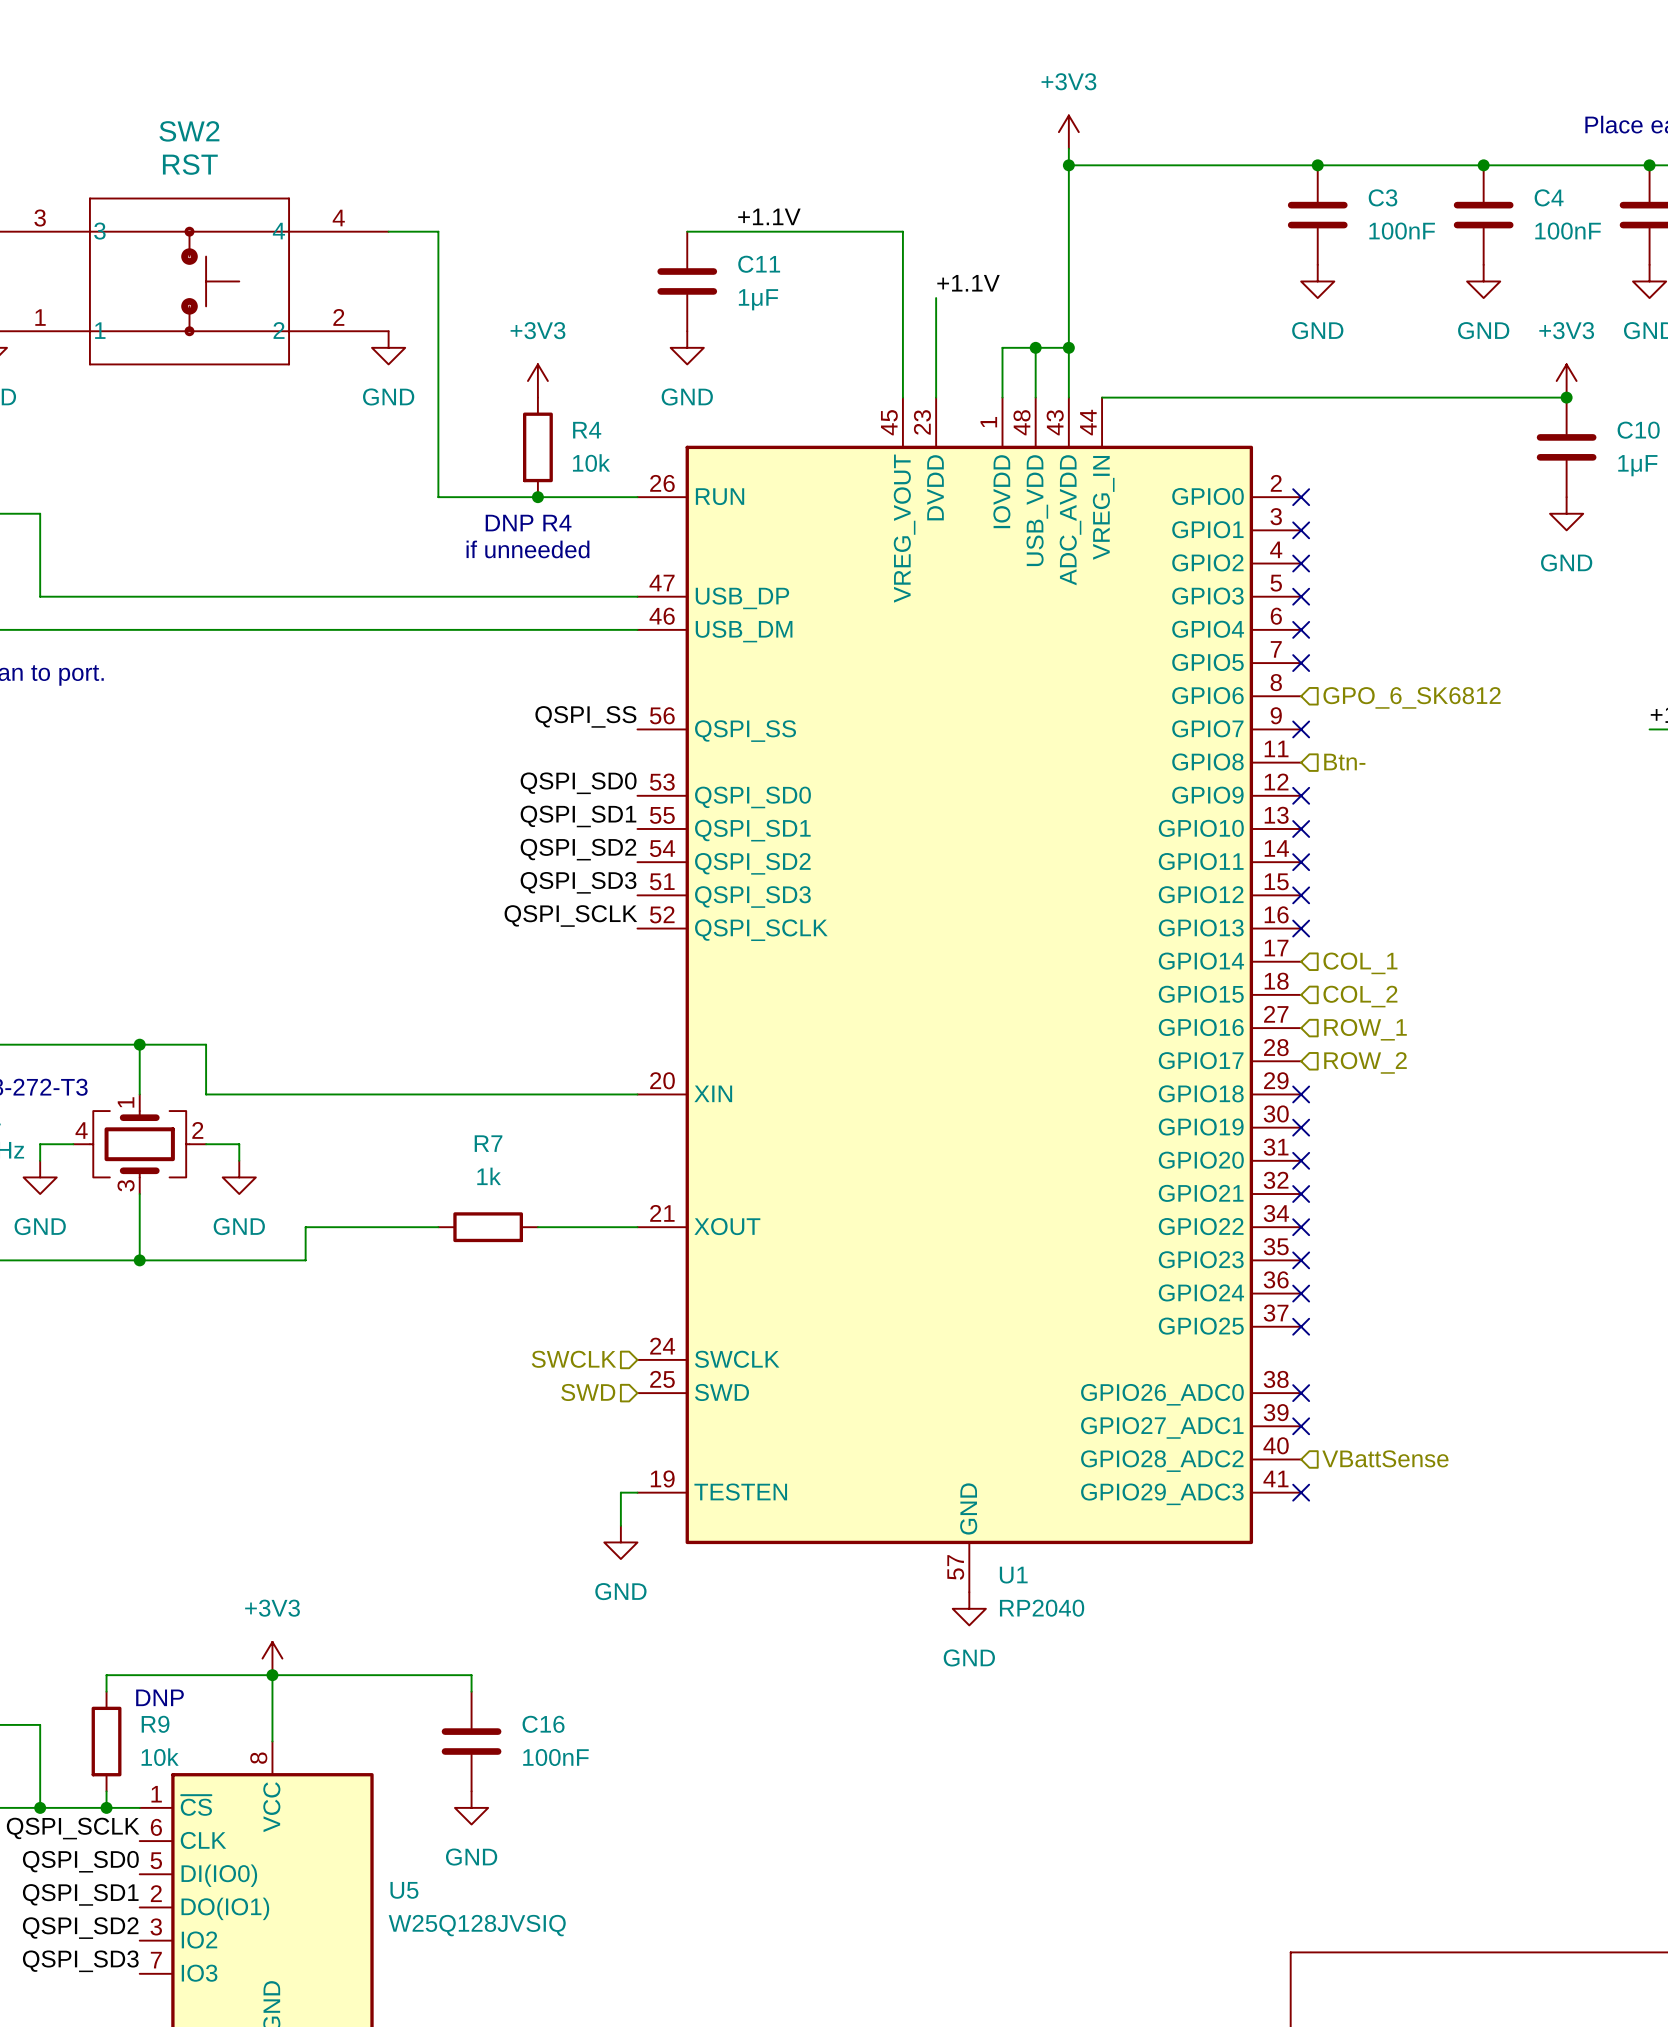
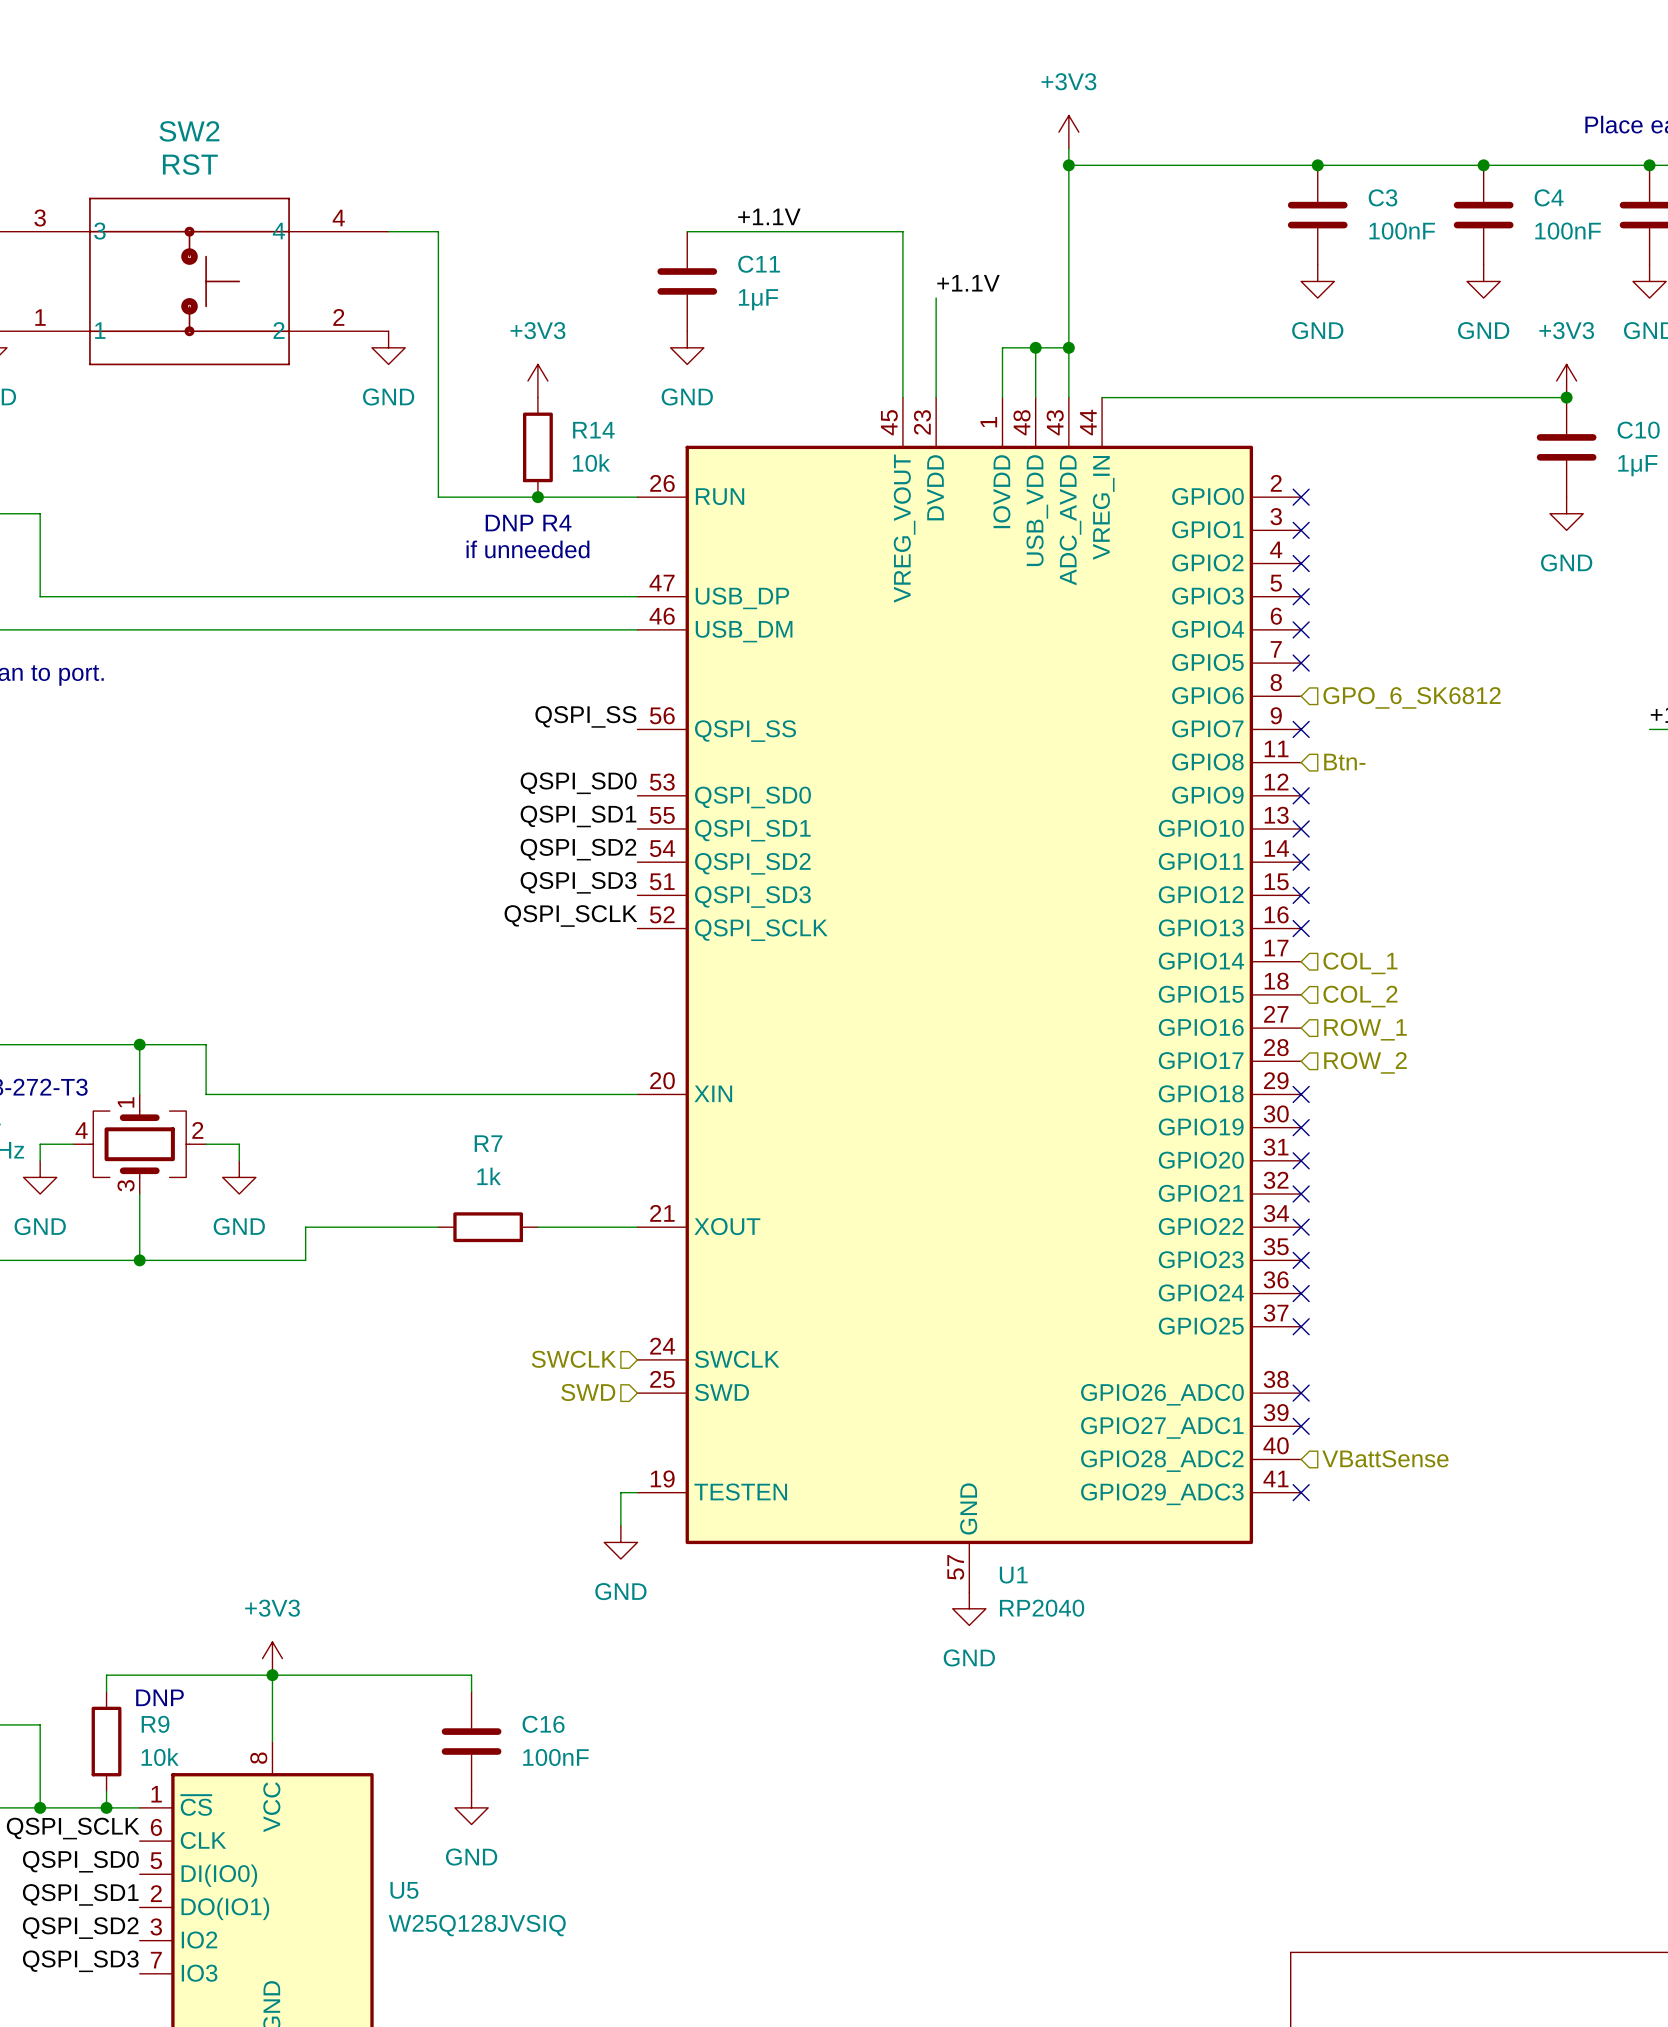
R4 name: R4 (587, 430) -> R14 (593, 430)

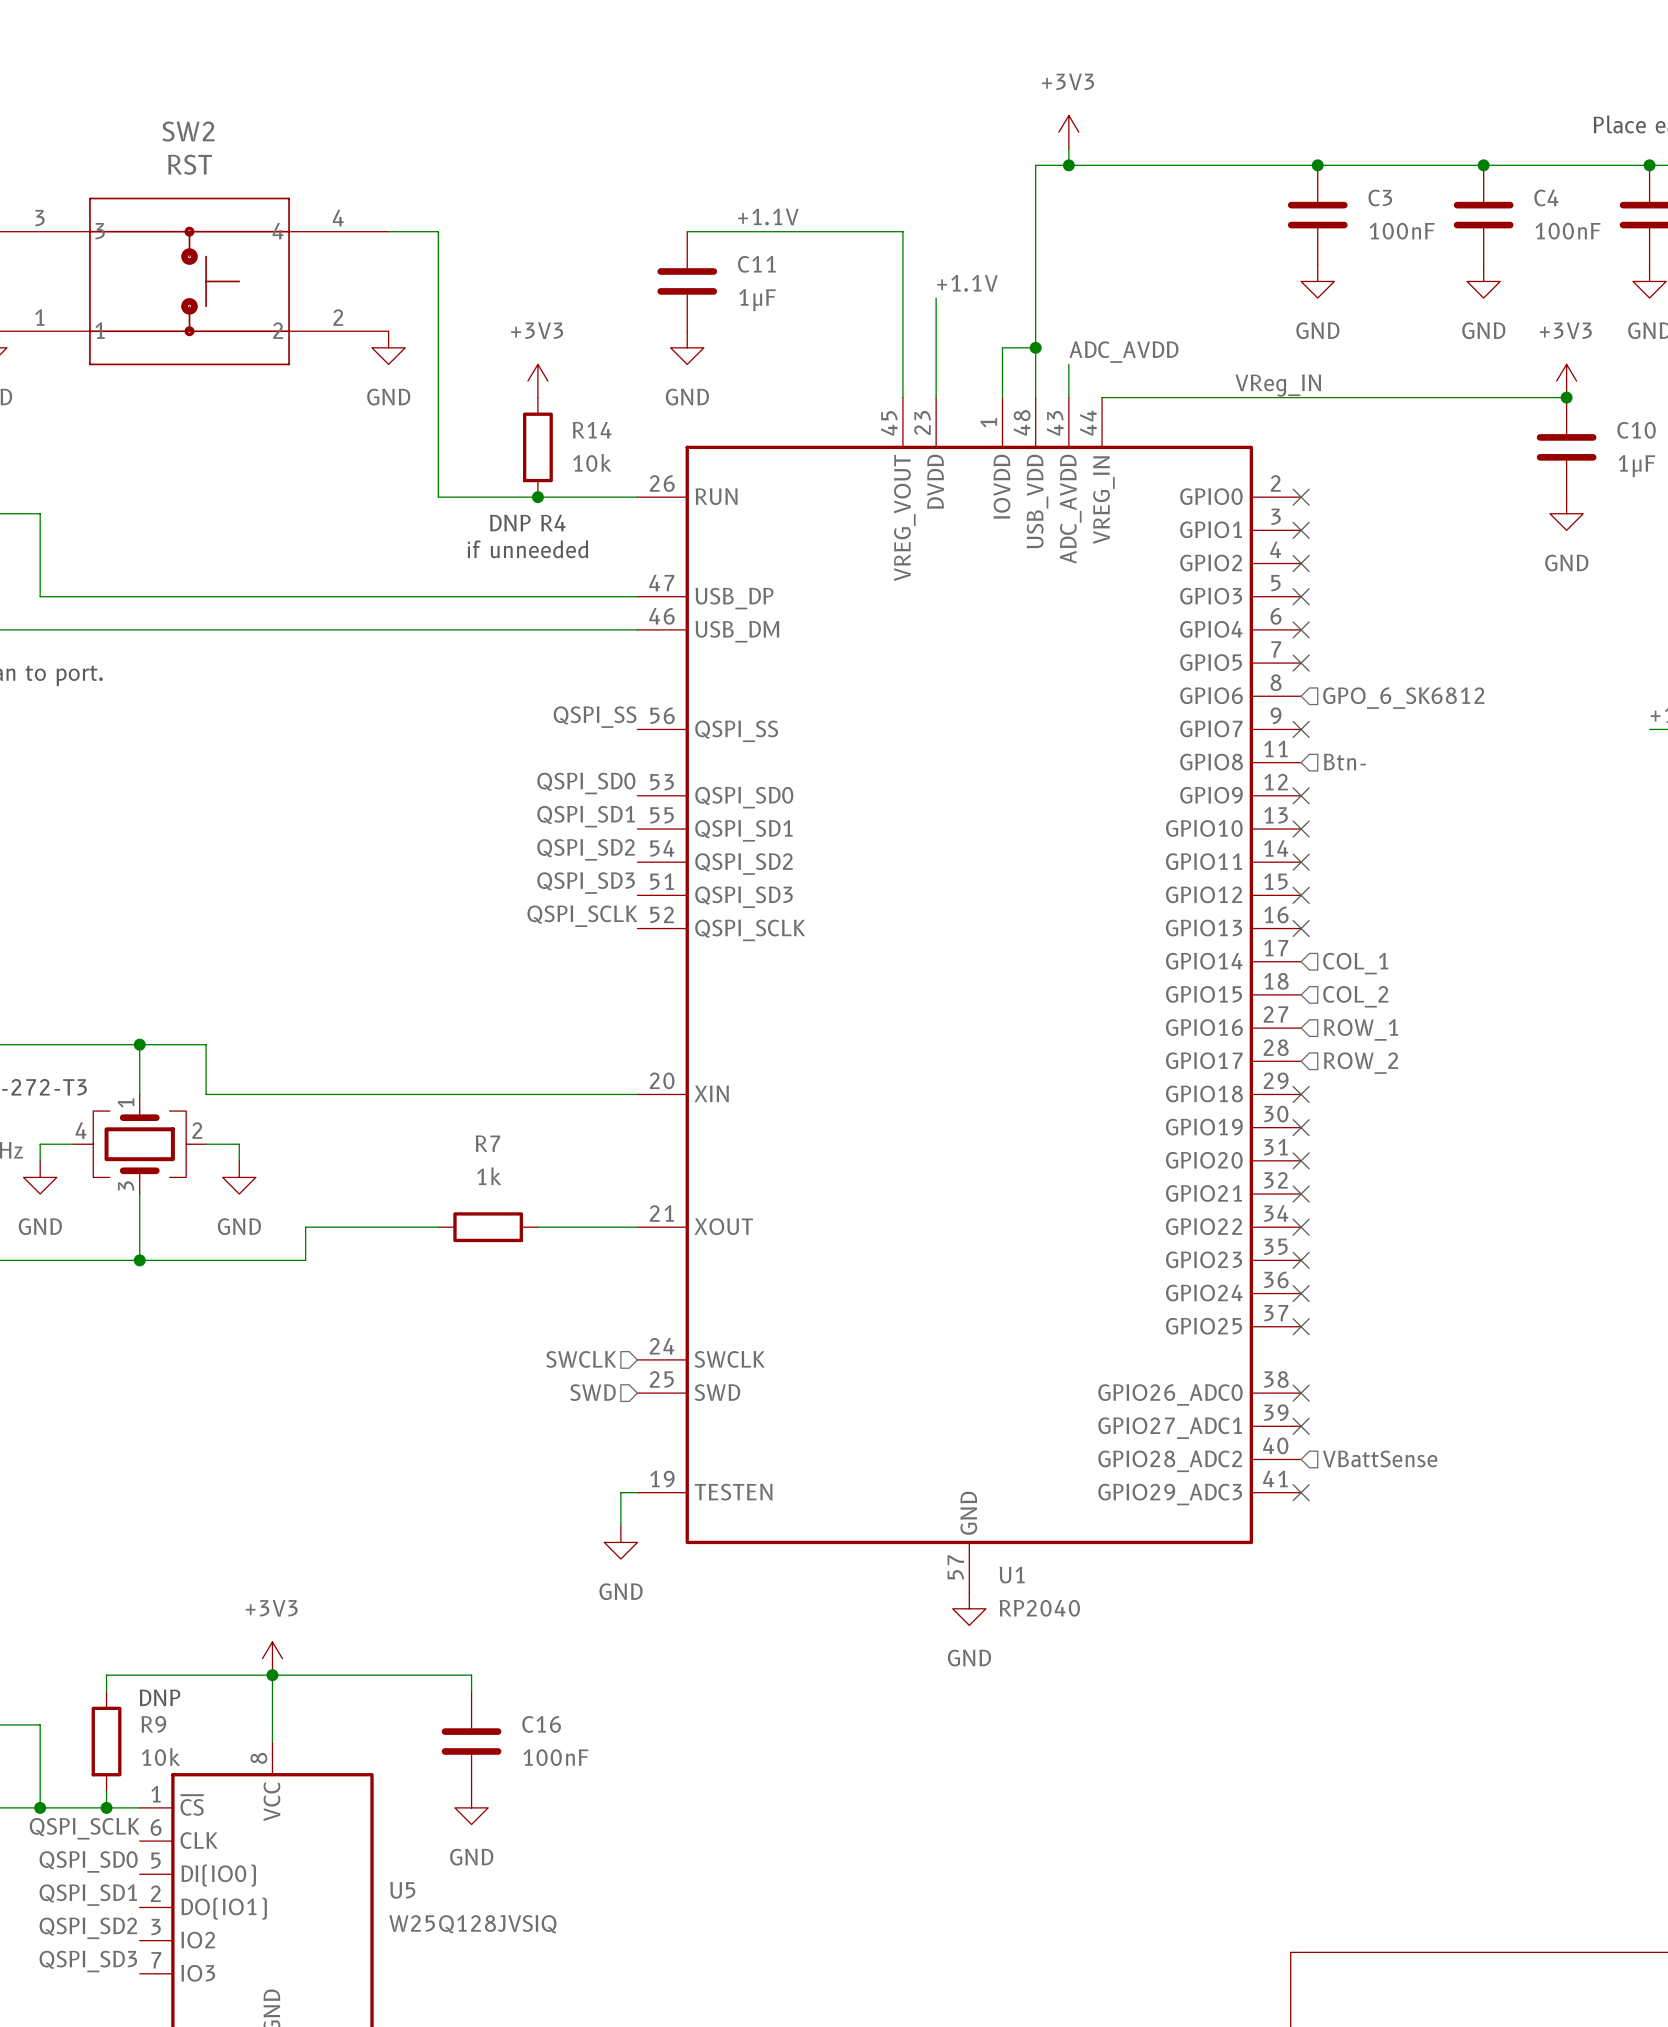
wire: (1068, 165) (1068, 364) -> (1068, 165) (1035, 165) (1035, 347)
wire: (1035, 347) (1068, 347) -> none
junction: (1068, 347) -> none
label: none -> ADC_AVDD (1124, 352)
label: none -> VReg_IN (1278, 385)

